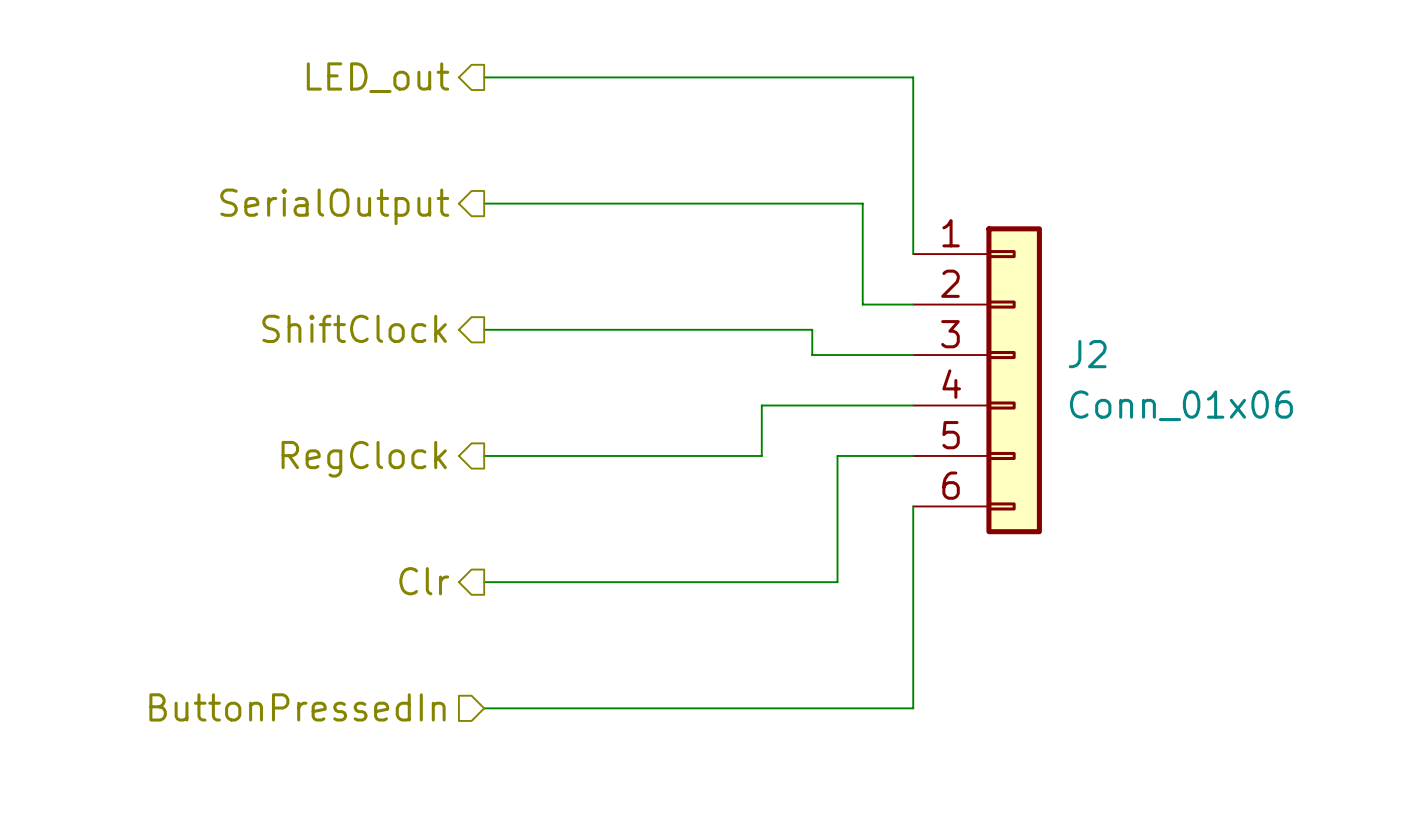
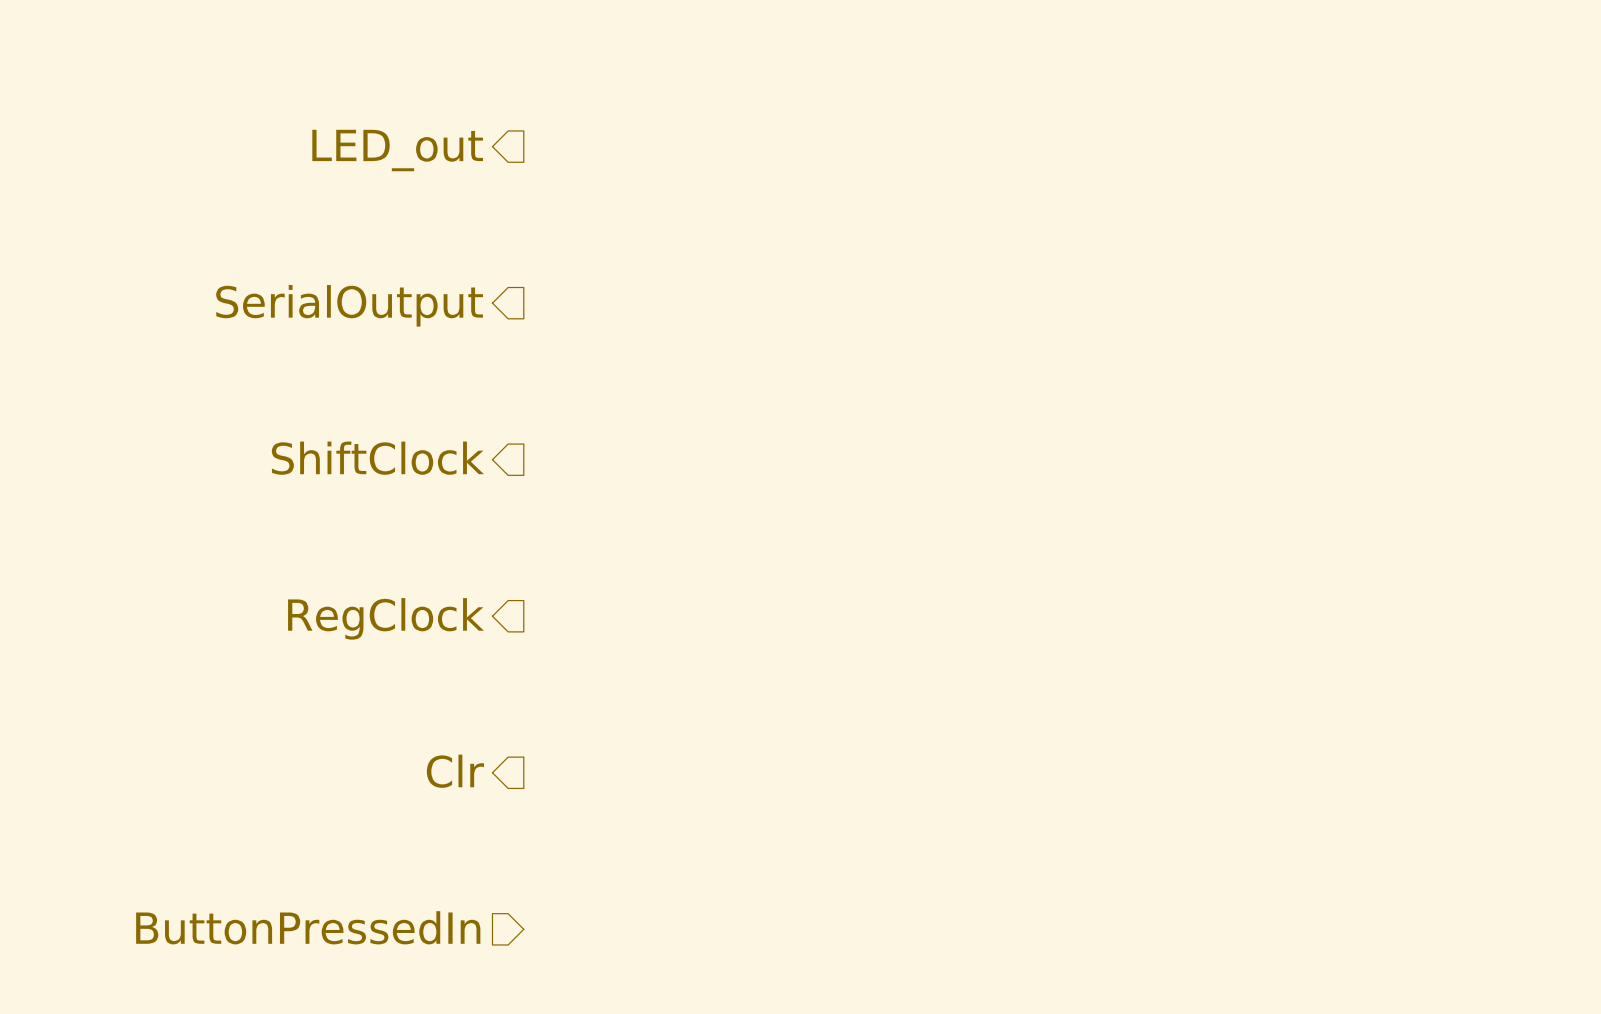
wire: (484, 77) (913, 77) (913, 254) -> none
wire: (484, 203) (862, 203) (862, 304) (913, 304) -> none
wire: (484, 329) (812, 329) (812, 355) (913, 355) -> none
J2: Conn_01x06 (977, 380) -> none
wire: (913, 405) (761, 405) (761, 455) (484, 455) -> none
wire: (913, 455) (837, 455) (837, 582) (484, 582) -> none
wire: (913, 506) (913, 708) (484, 708) -> none

